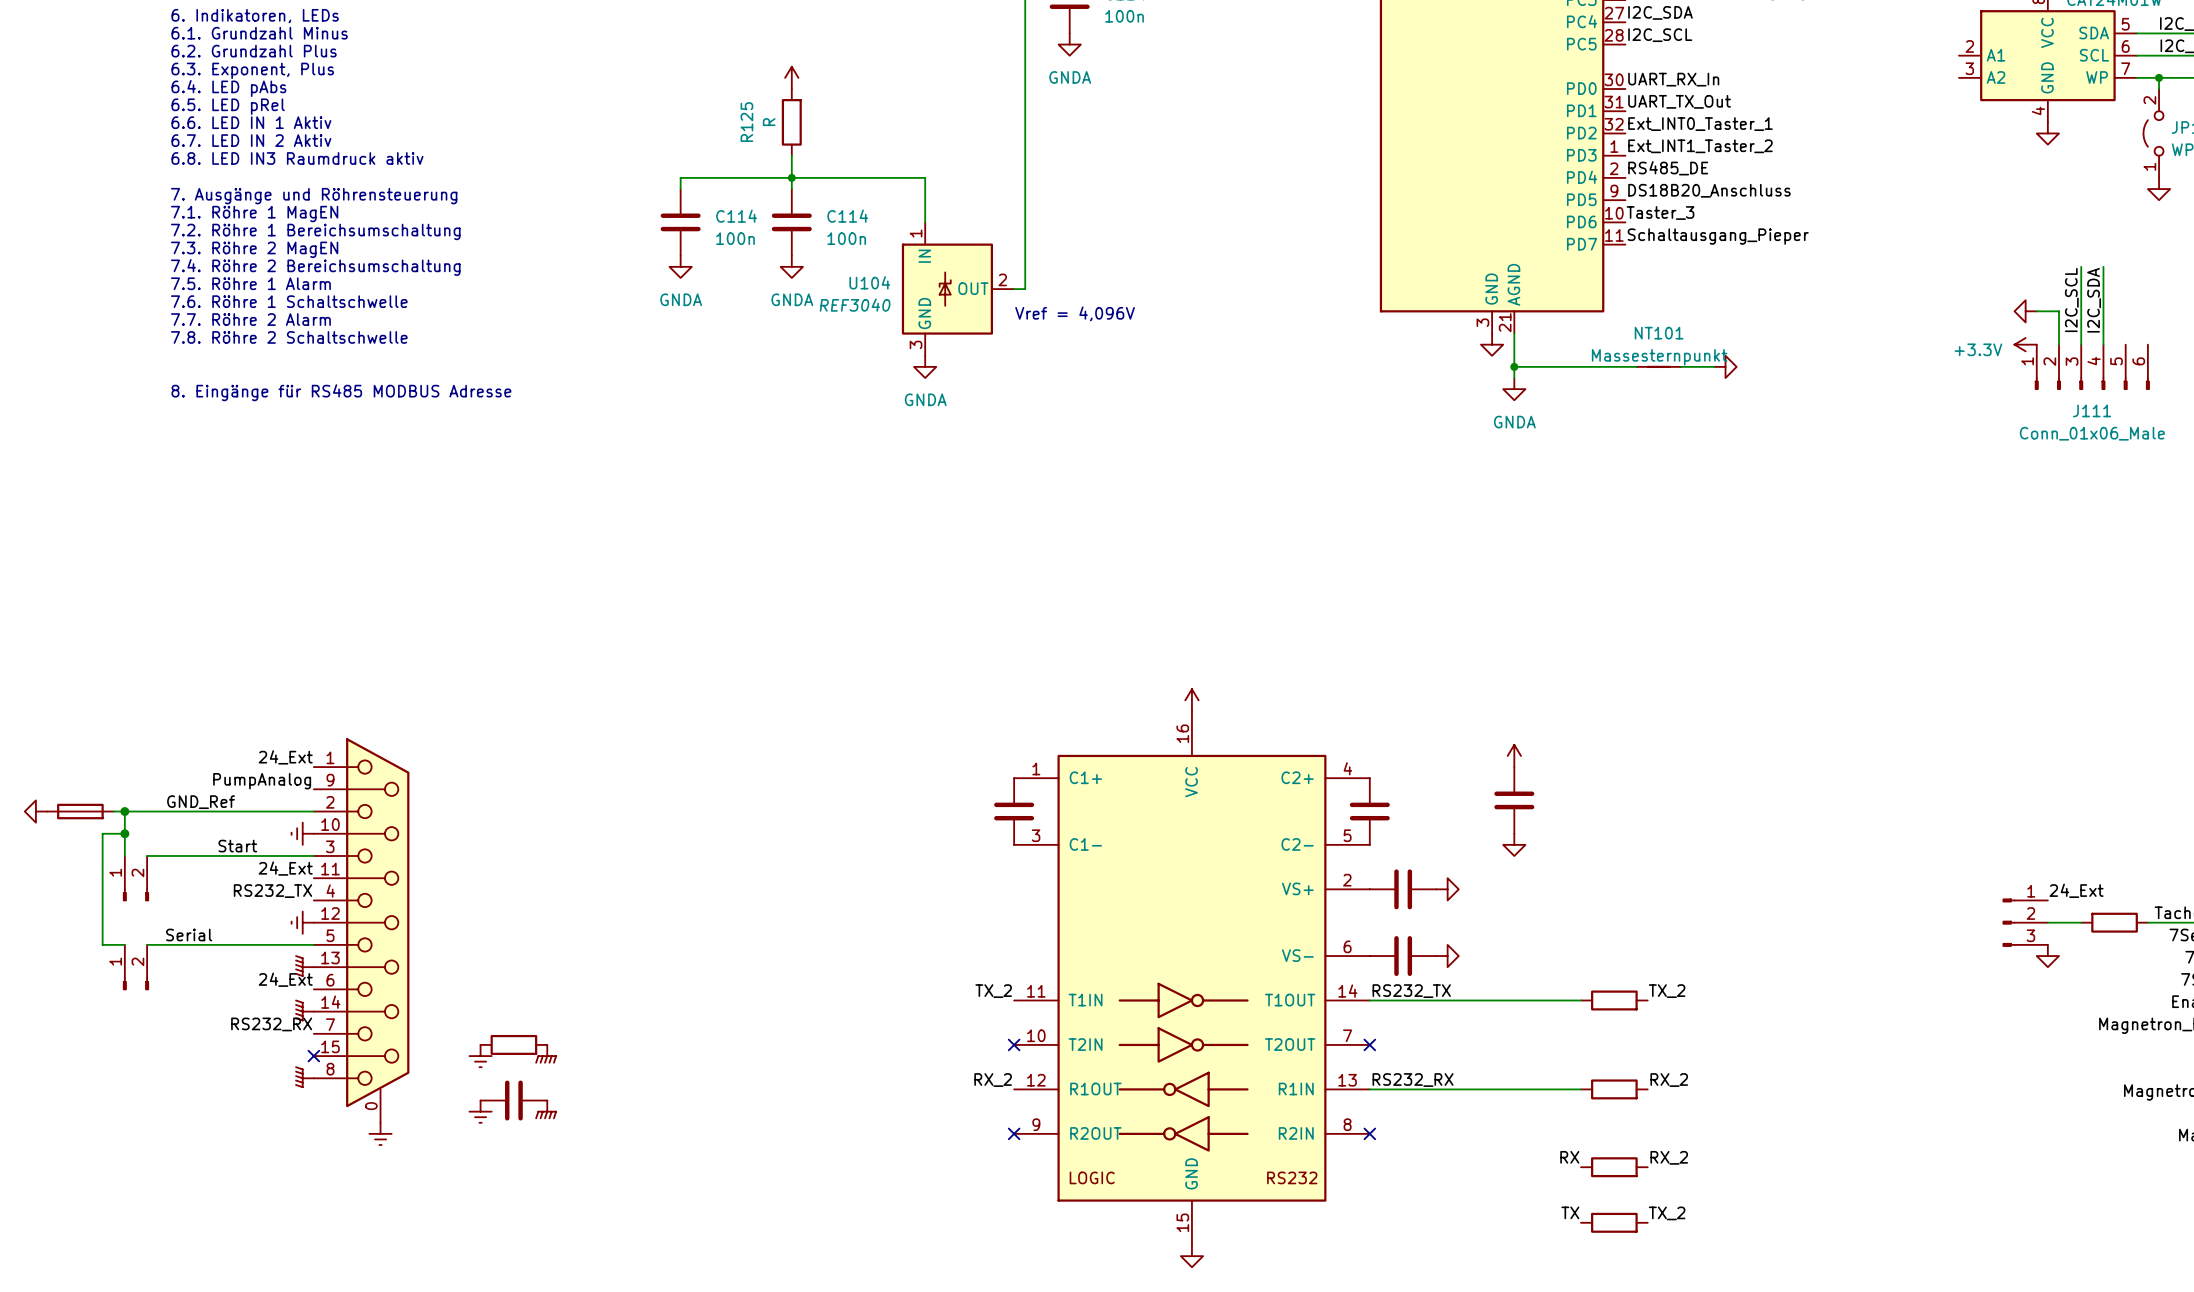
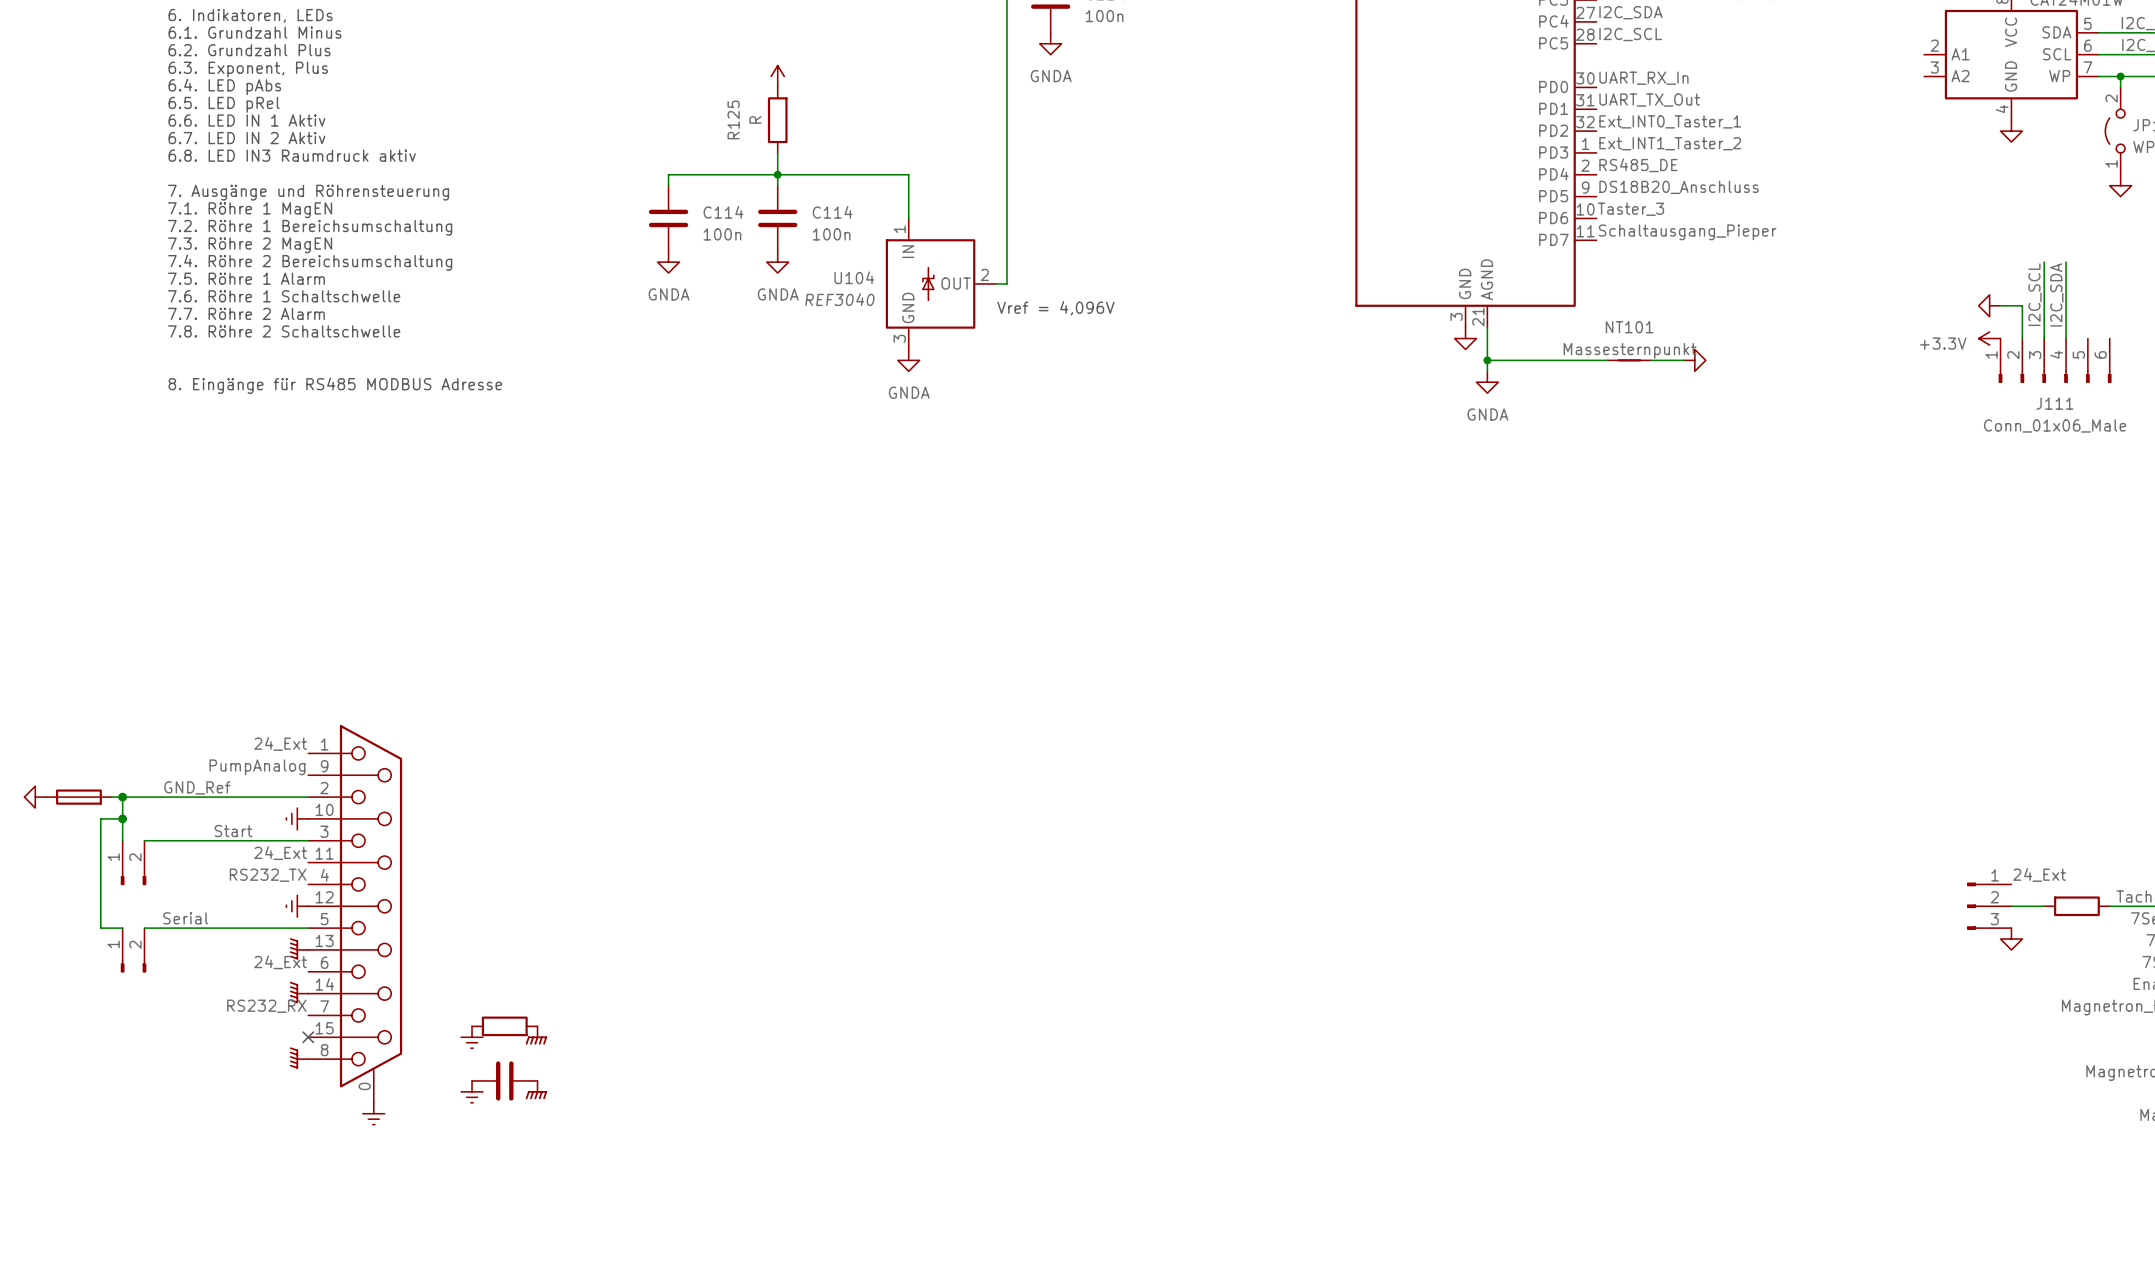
power symbol: (1191, 700) -> none
power symbol: (1514, 755) -> none
part: (1514, 800) -> none
part: (1014, 811) -> none
part: (1369, 811) -> none
power symbol: (1514, 844) -> none
part: (1403, 889) -> none
power symbol: (1447, 889) -> none
part: (1403, 956) -> none
power symbol: (1447, 956) -> none
part: (1191, 978) -> none
label: TX_2 (993, 991) -> none
label: RS232_TX (1411, 991) -> none
label: TX_2 (1667, 991) -> none
wire: (1369, 1000) (1581, 1000) -> none
part: (1614, 1000) -> none
no-connect mark: (1014, 1044) -> none
no-connect mark: (1369, 1044) -> none
label: RX_2 (993, 1080) -> none
label: RS232_RX (1413, 1080) -> none
label: RX_2 (1669, 1080) -> none
wire: (1369, 1089) (1581, 1089) -> none
part: (1614, 1089) -> none
no-connect mark: (1014, 1133) -> none
no-connect mark: (1369, 1133) -> none
label: RX (1569, 1157) -> none
label: RX_2 (1669, 1157) -> none
part: (1614, 1167) -> none
label: TX (1570, 1212) -> none
label: TX_2 (1667, 1213) -> none
part: (1614, 1222) -> none
power symbol: (1191, 1256) -> none

